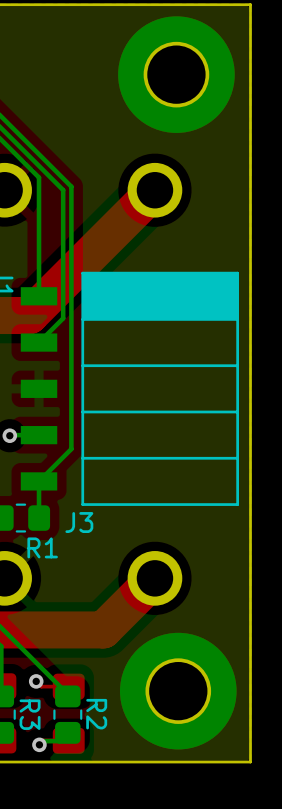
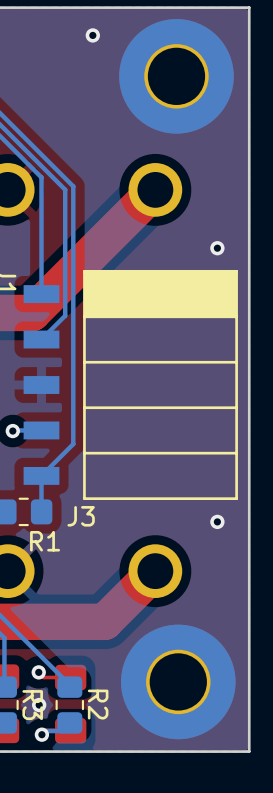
via: none -> (92, 35)
via: none -> (217, 248)
via: none -> (217, 521)
via: none -> (39, 705)

